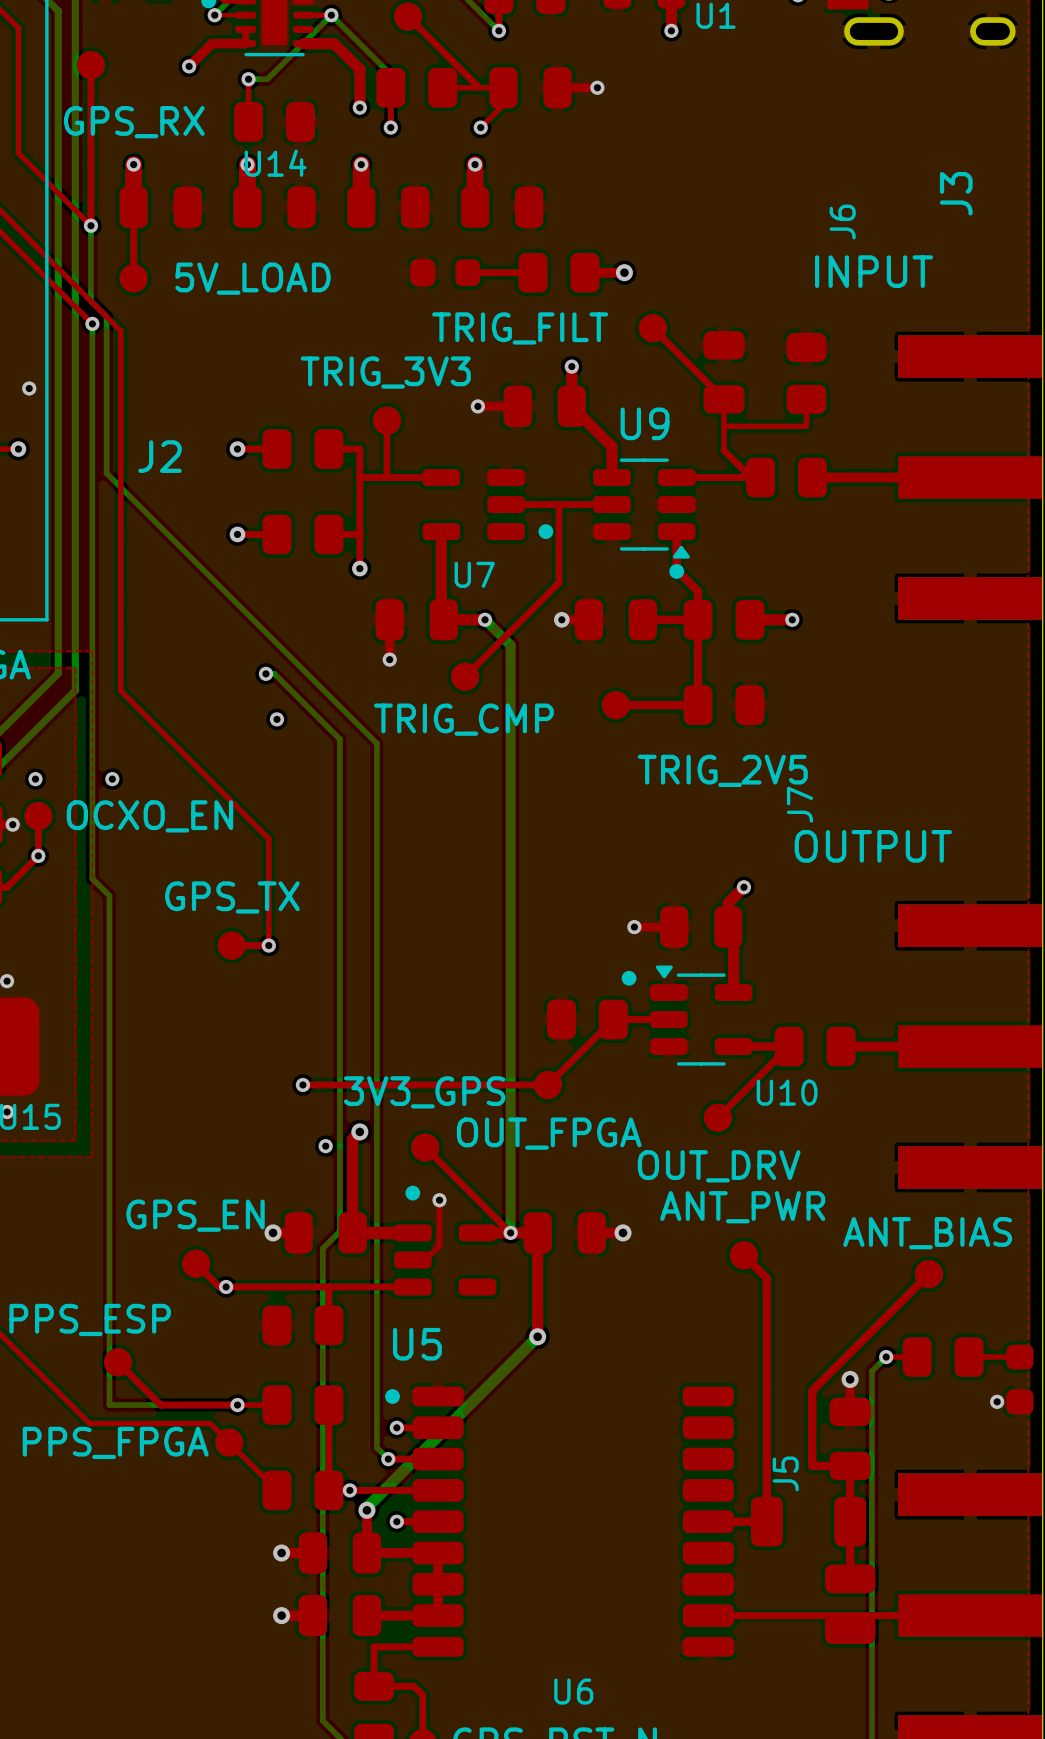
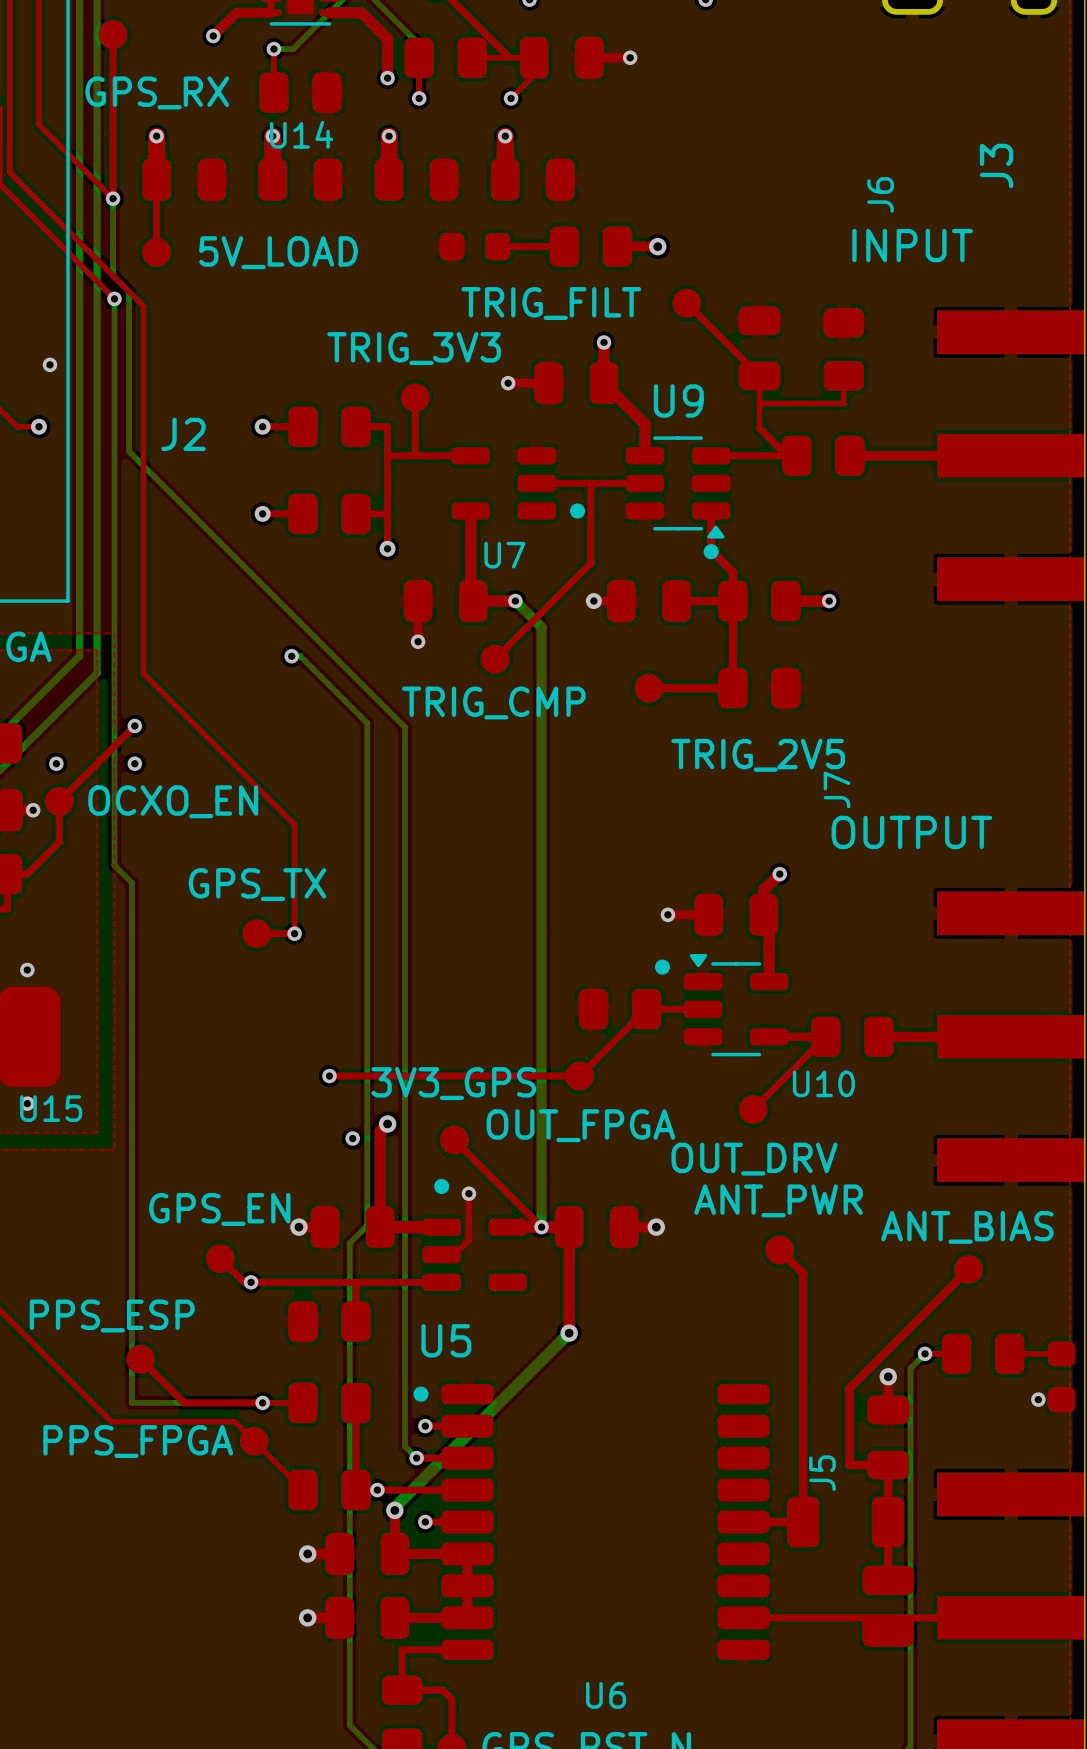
via: (276, 719) -> none
top track: none -> (134, 725) (59, 801)
via: none -> (134, 725)
via: (38, 855) -> none

